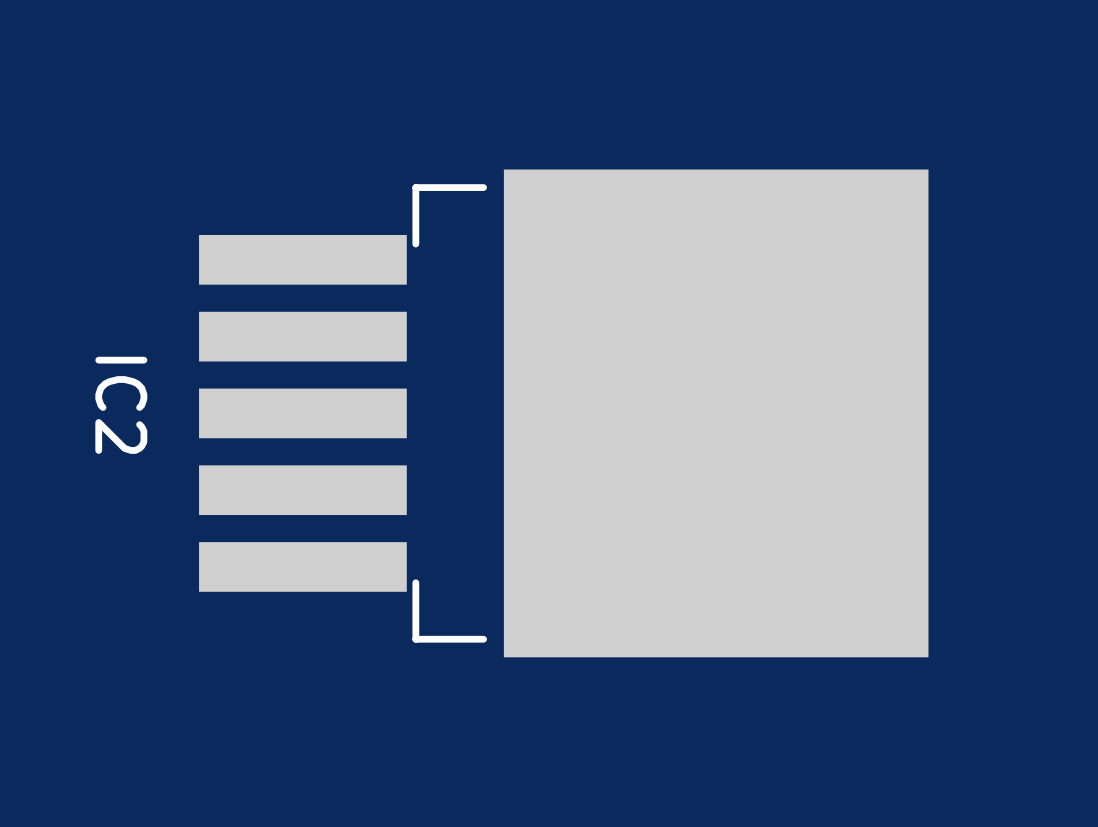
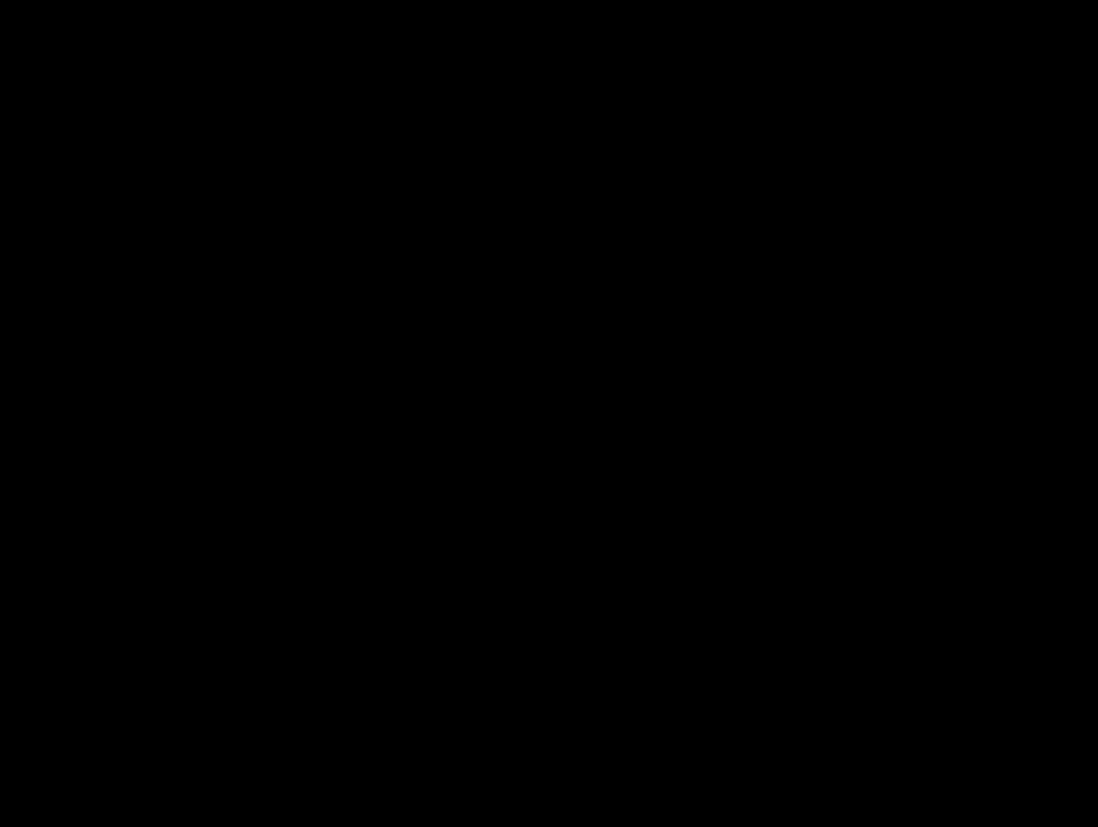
IC2: (563, 413) -> none

